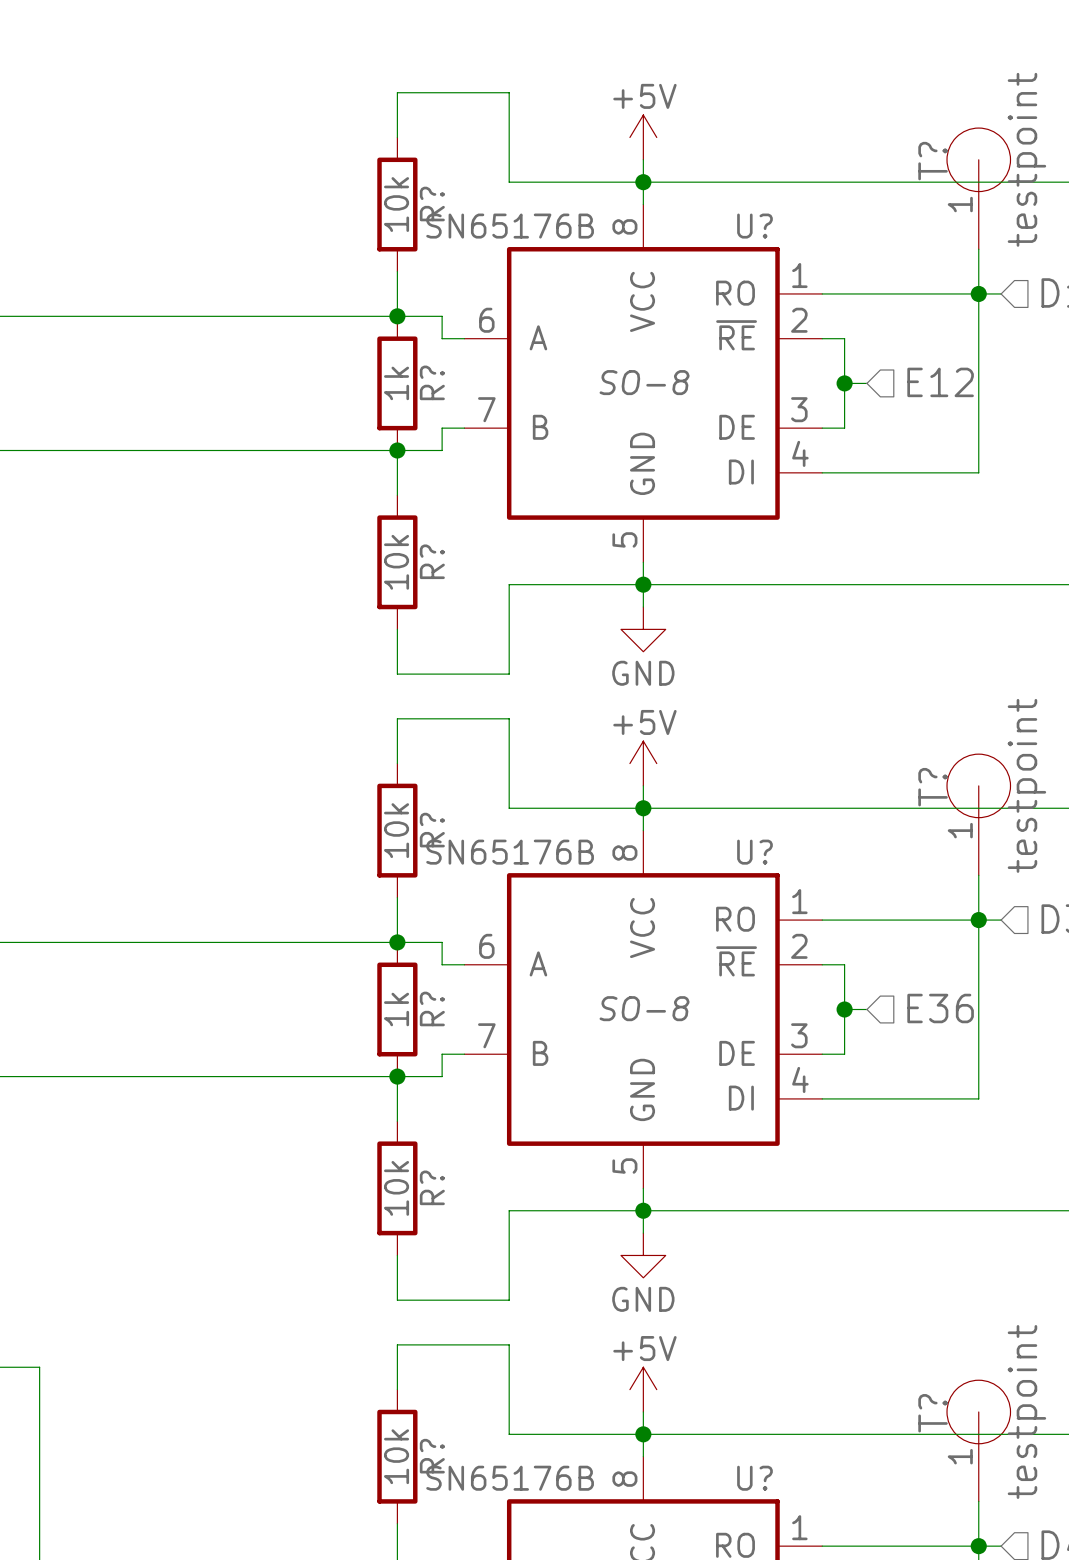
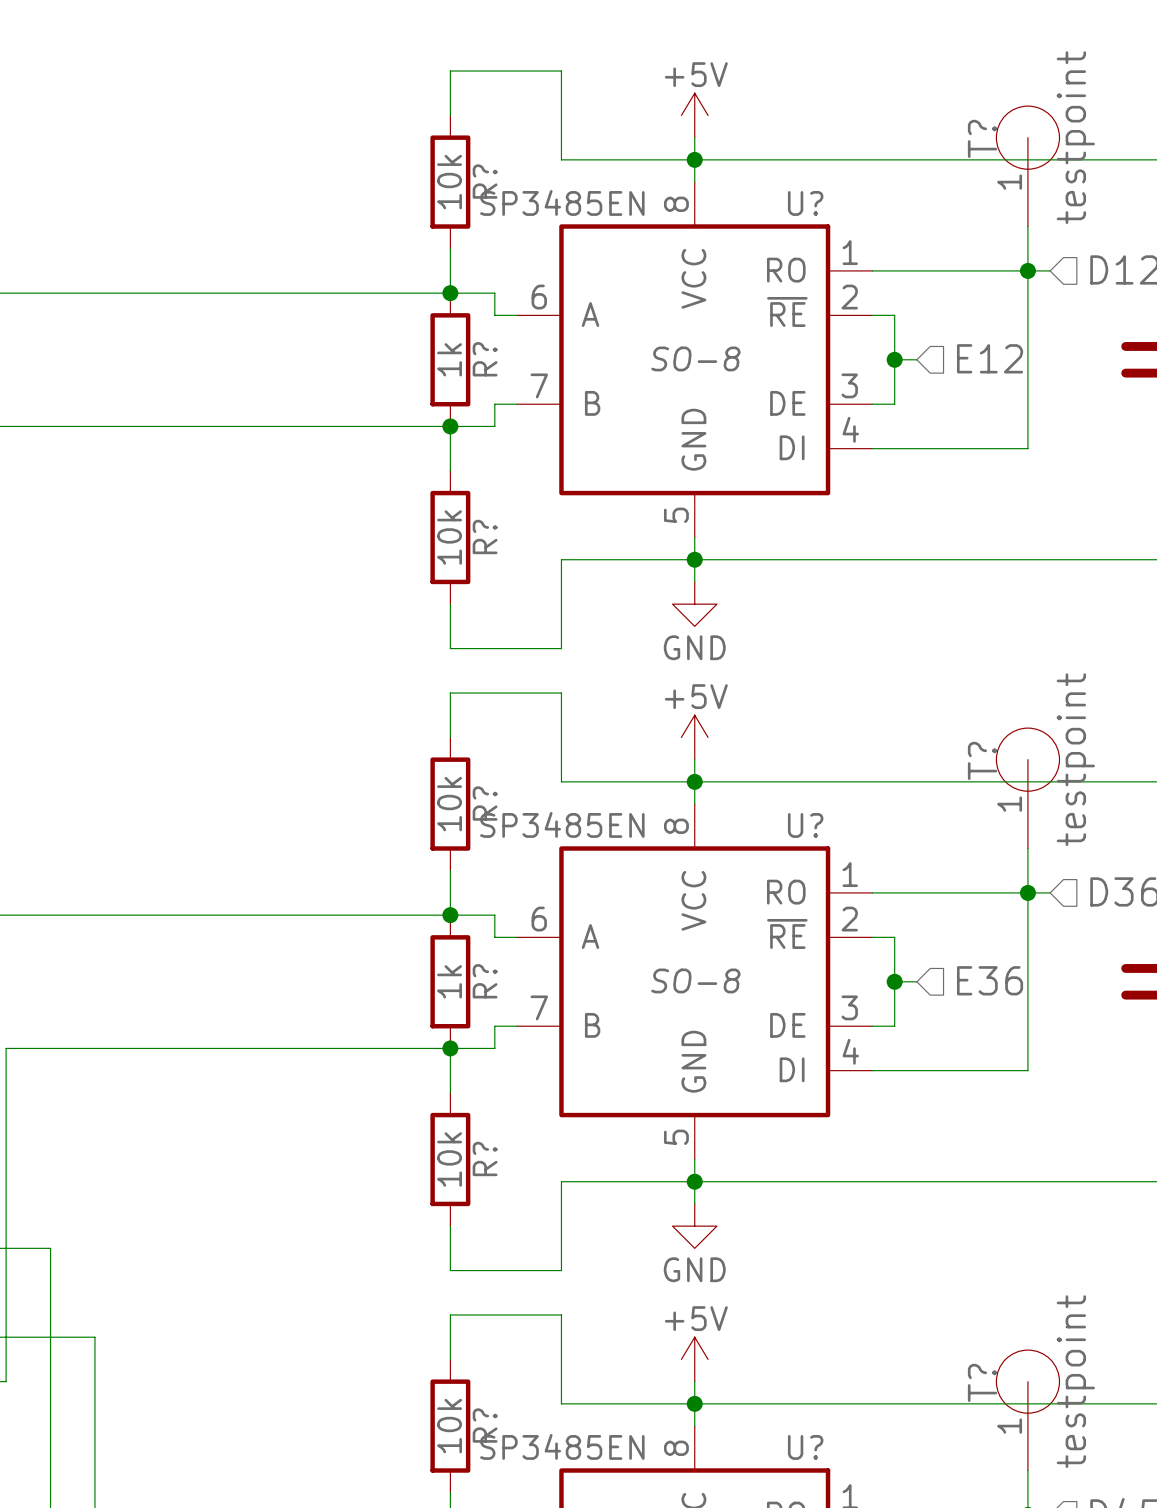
U? value: SN65176B (510, 226) -> SP3485EN (562, 202)
U? value: SN65176B (510, 852) -> SP3485EN (562, 824)
U? value: SN65176B (510, 1478) -> SP3485EN (562, 1446)

